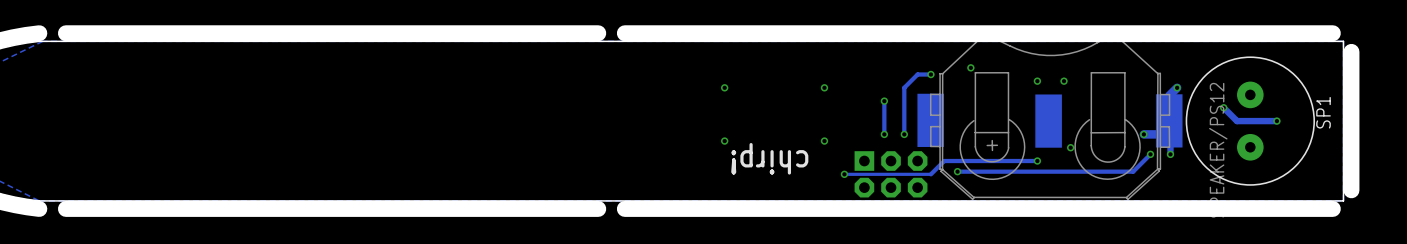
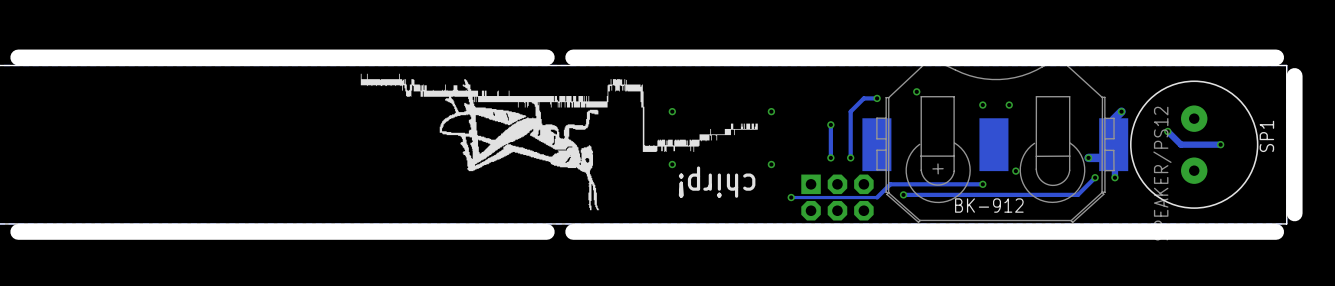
part footprint: [917, 36, 1183, 201] -> [862, 60, 1129, 224]
drawing: none -> [360, 73, 758, 211]

